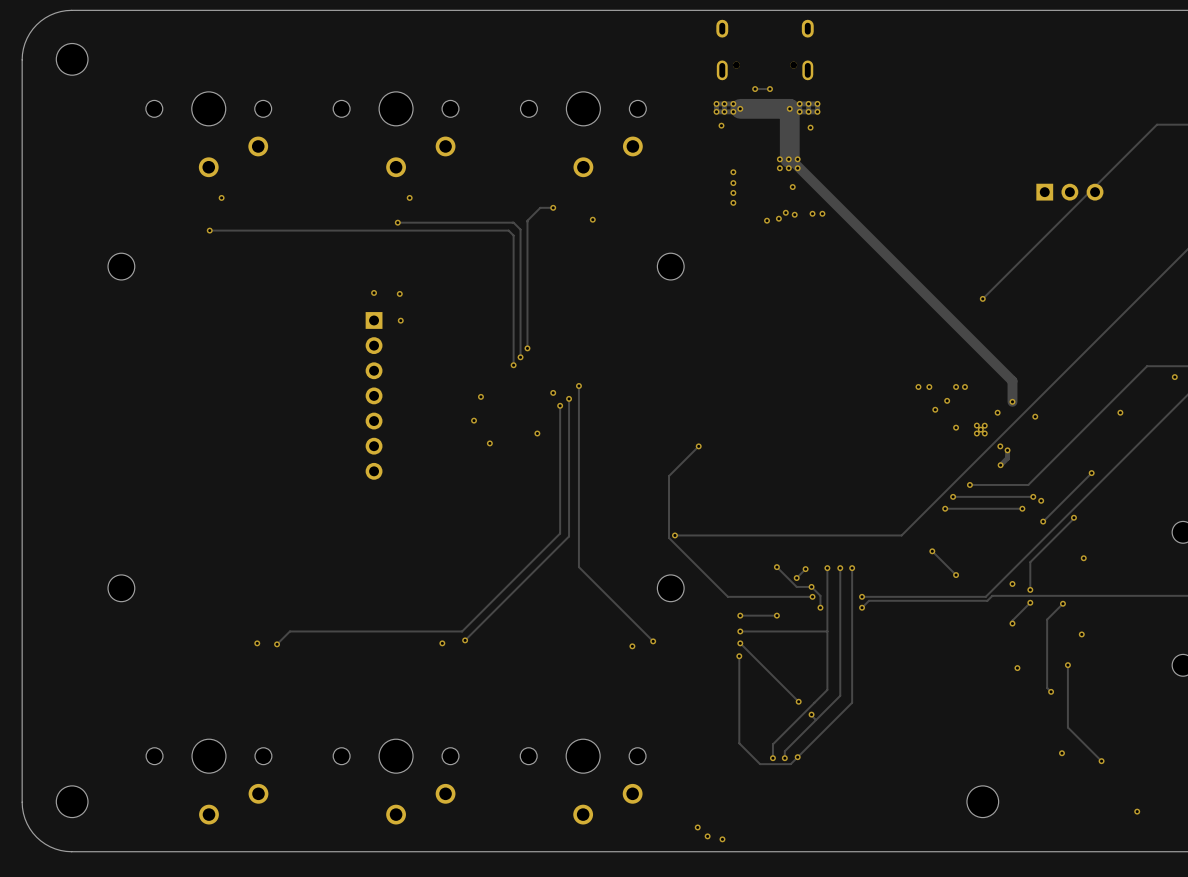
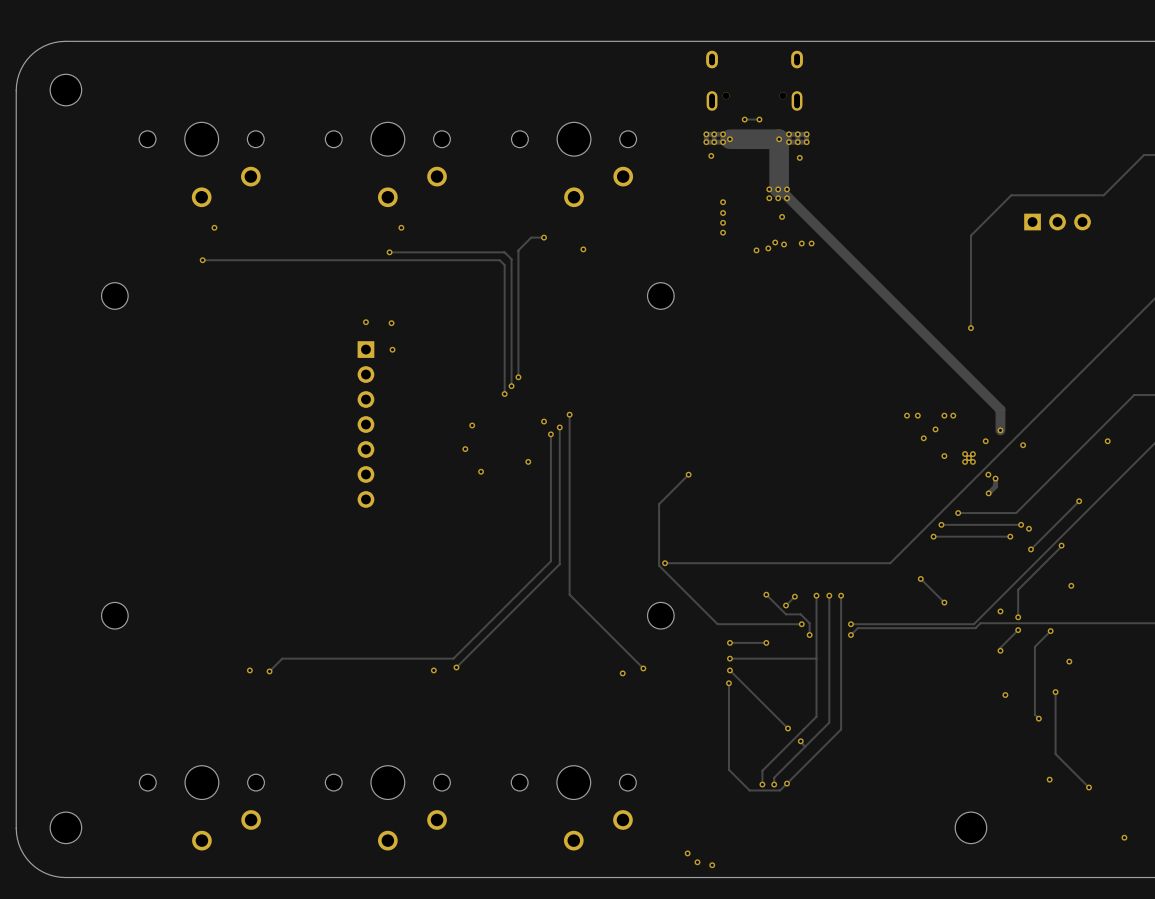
track: (1116, 165) (982, 298) -> (1103, 195) (1011, 195) (970, 235) (970, 328)
via: (811, 586) -> none

